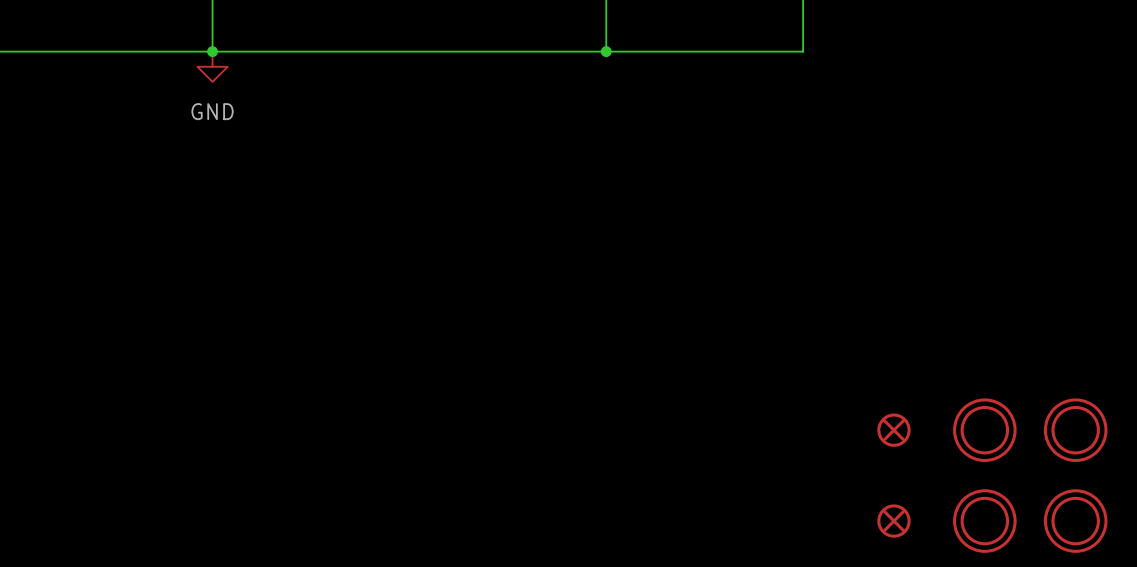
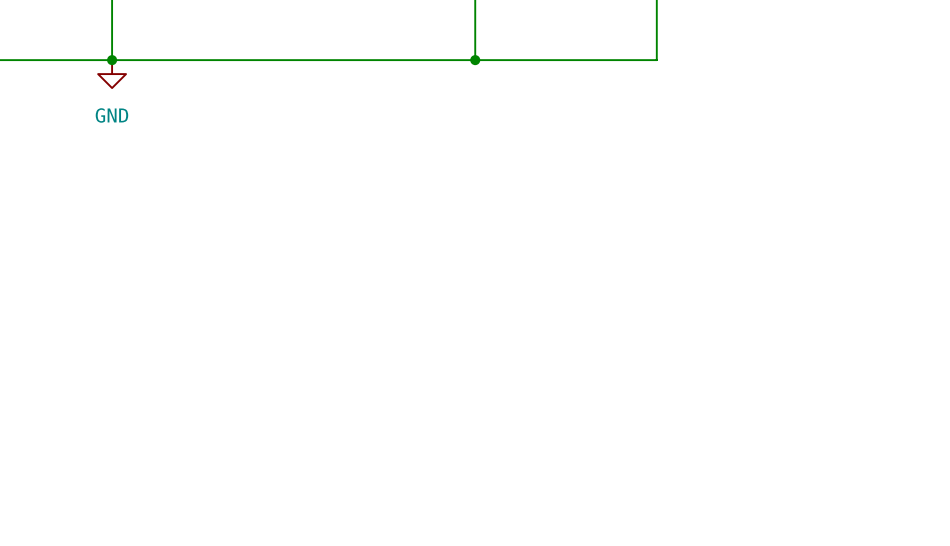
part: (893, 430) -> none
part: (984, 430) -> none
part: (1075, 430) -> none
part: (893, 521) -> none
part: (984, 521) -> none
part: (1075, 521) -> none

